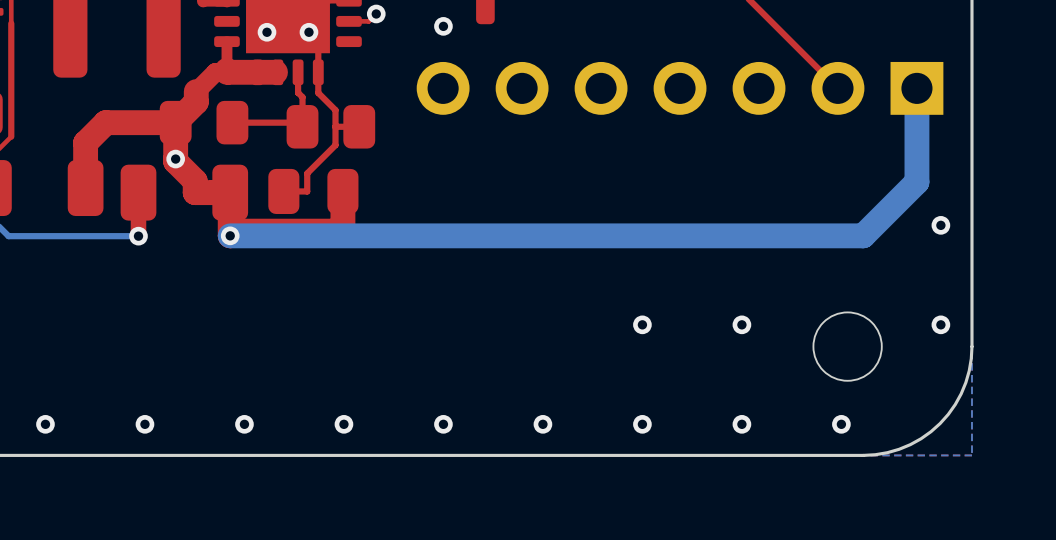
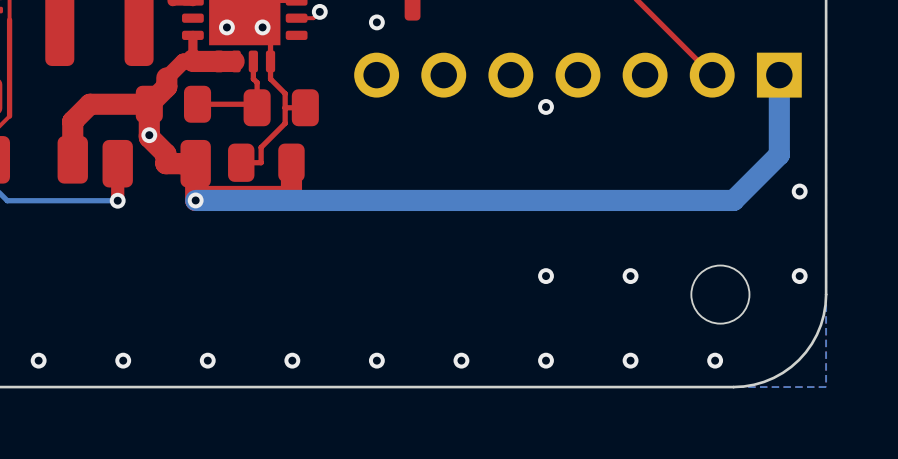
via: none -> (546, 106)

